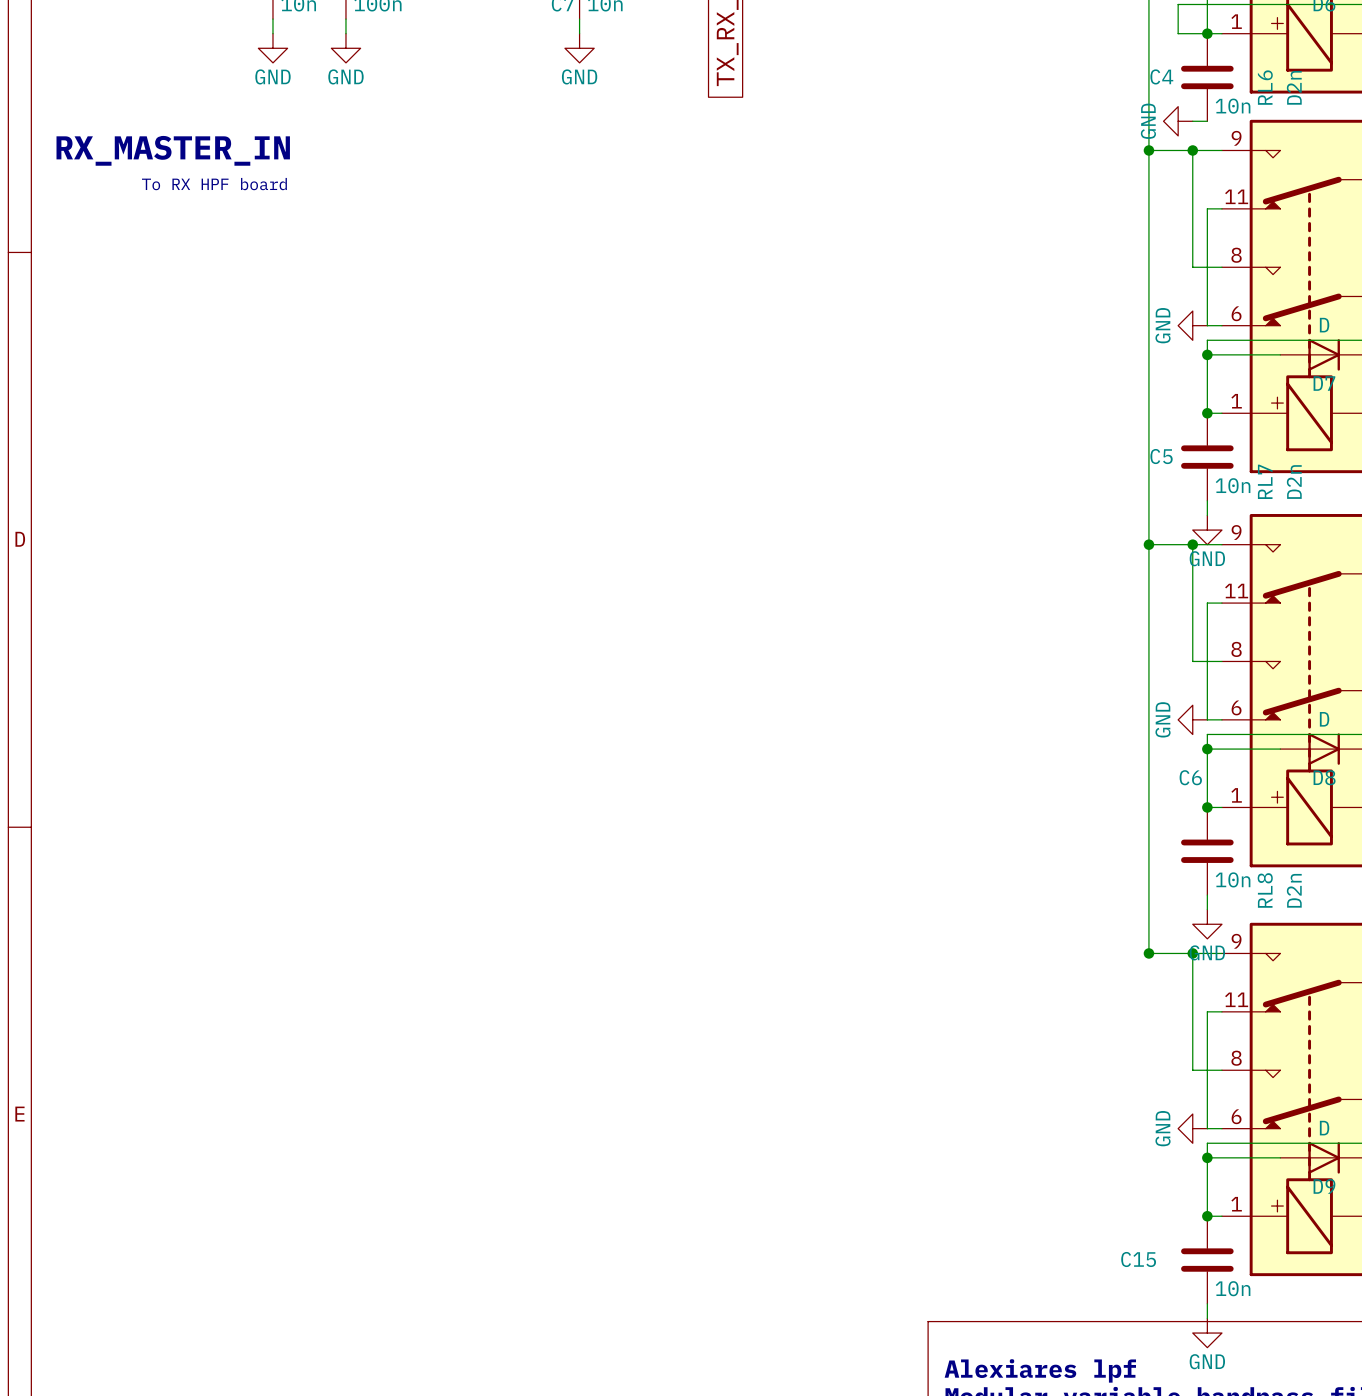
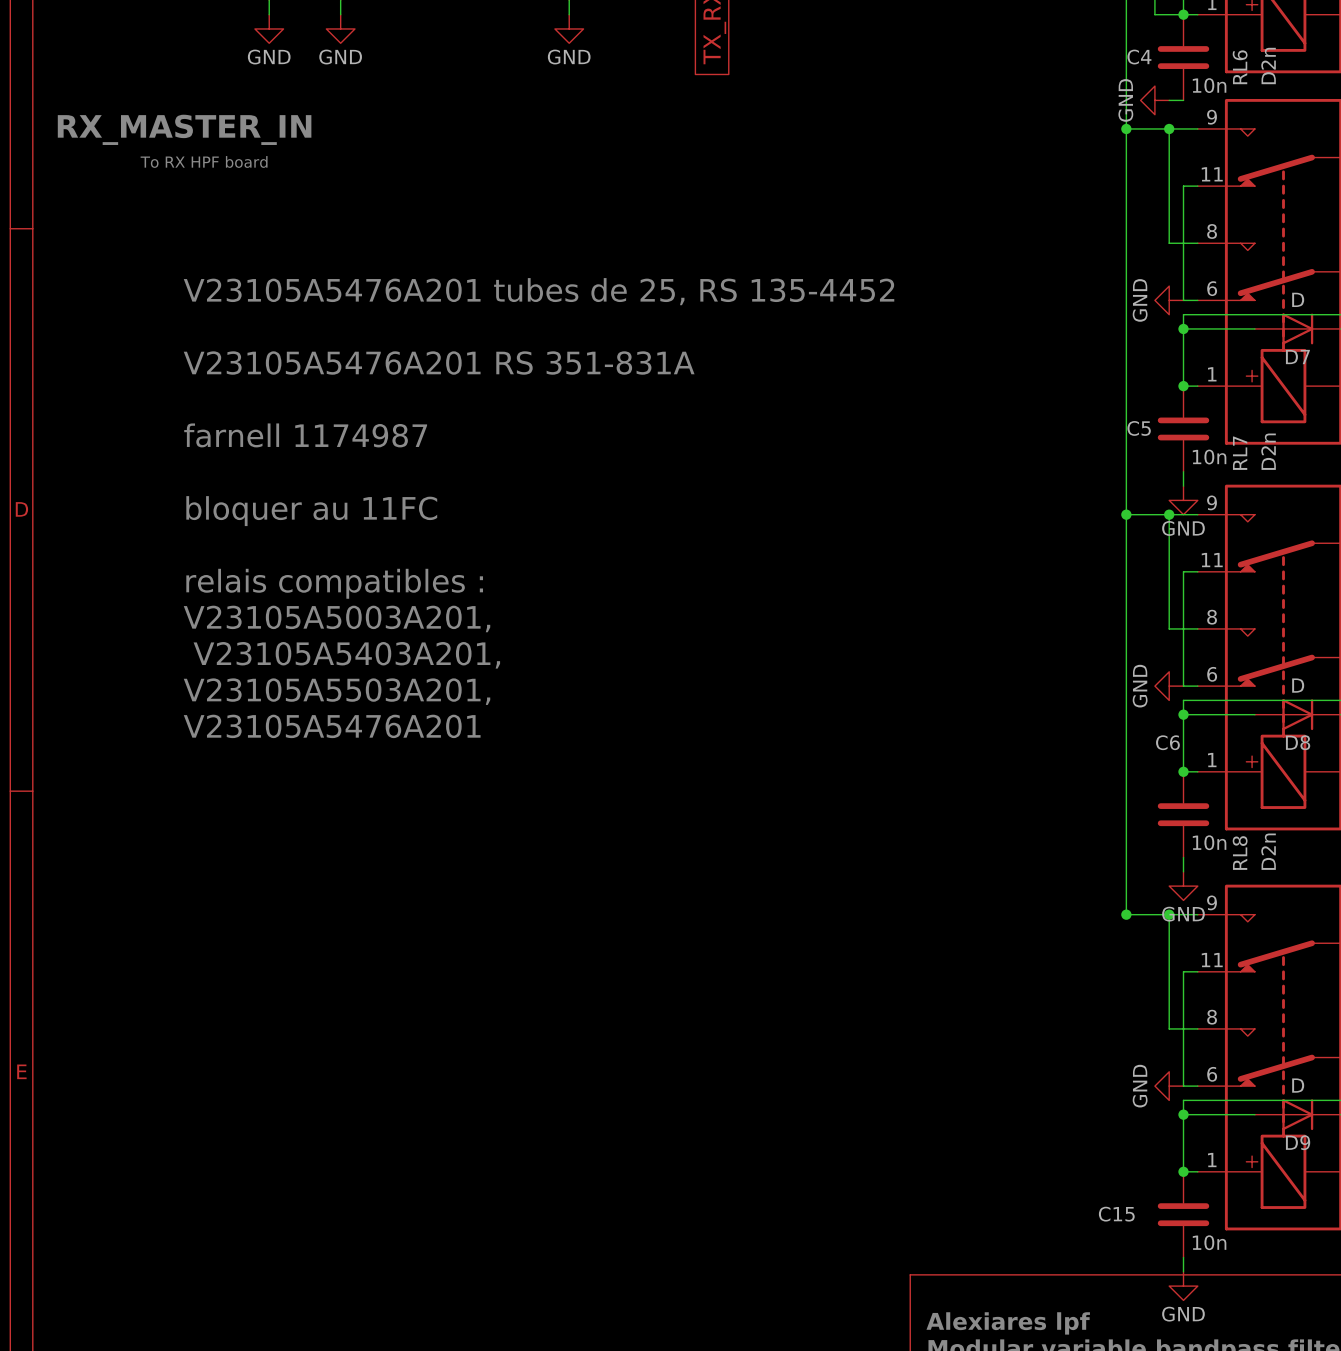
text: none -> V23105A5476A201 tubes de 25, RS 135-4452 (539, 291)
text: none -> V23105A5476A201 RS 351-831A (439, 363)
text: none -> farnell 1174987 (305, 435)
text: none -> bloquer au 11FC (311, 511)
text: none -> relais compatibles : (334, 583)
text: none -> V23105A5003A201, (337, 618)
text: none -> V23105A5403A201, (346, 655)
text: none -> V23105A5503A201, (337, 691)
text: none -> V23105A5476A201 (332, 726)

